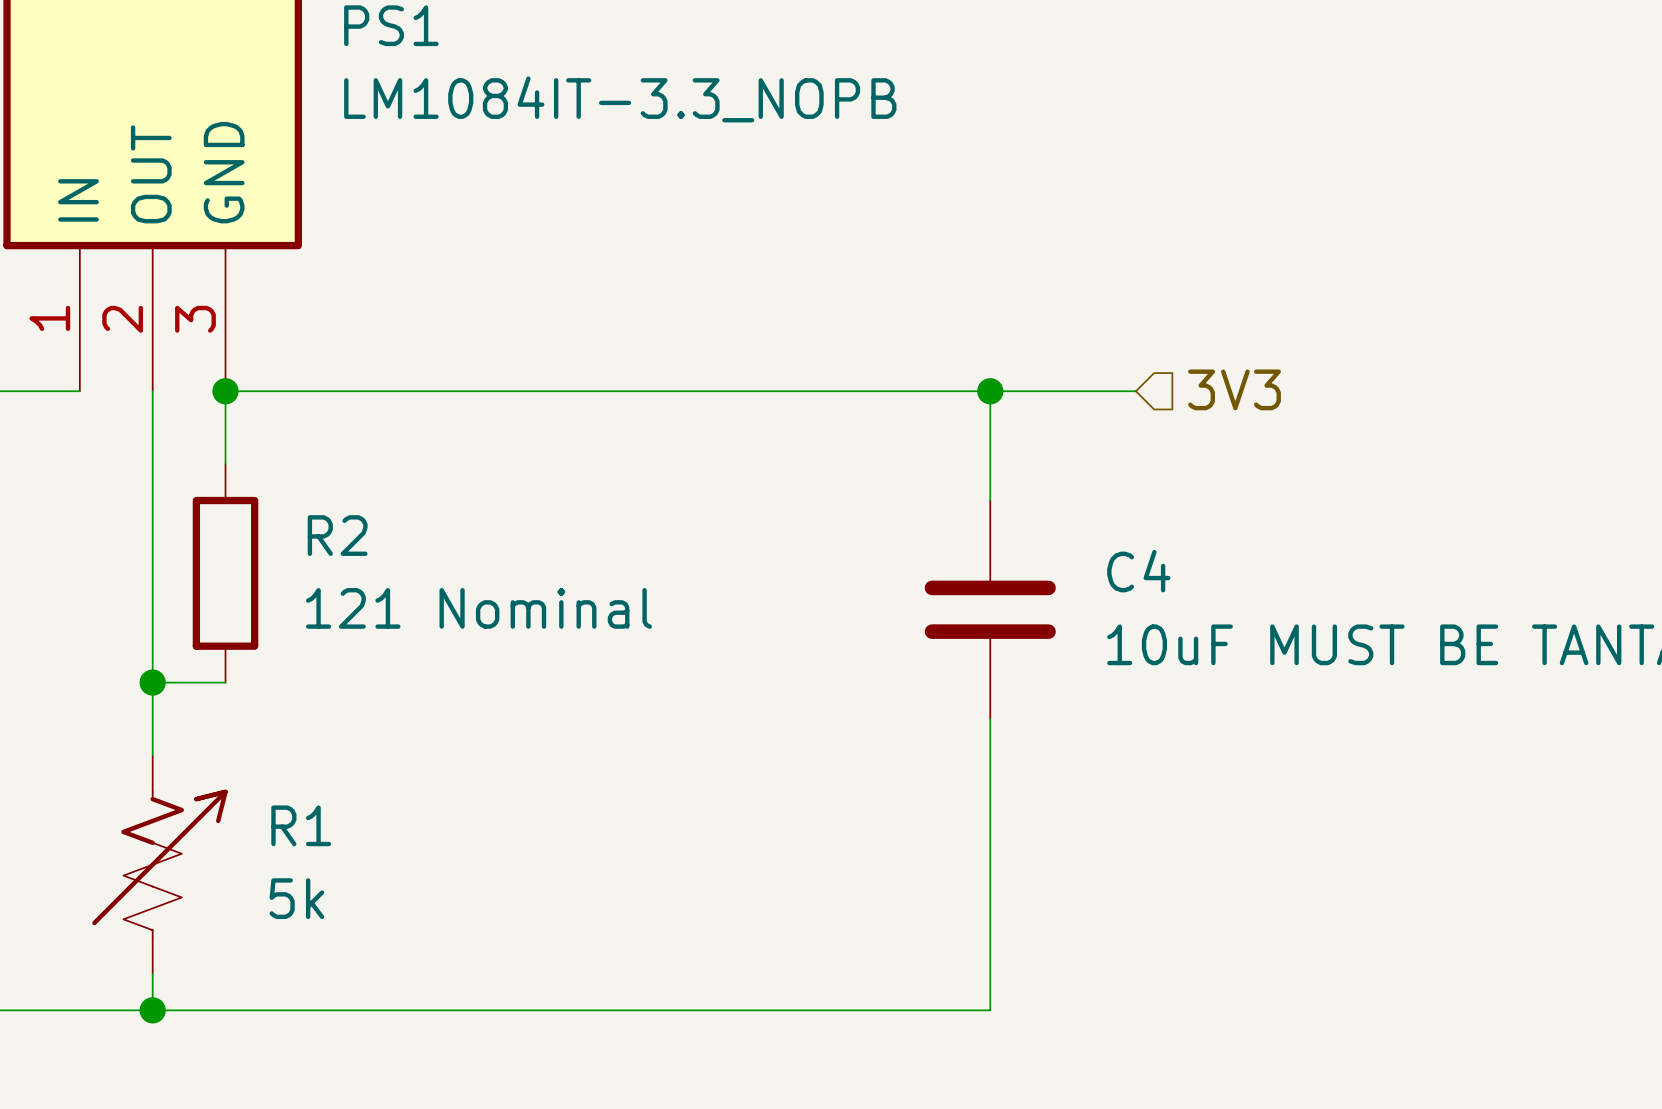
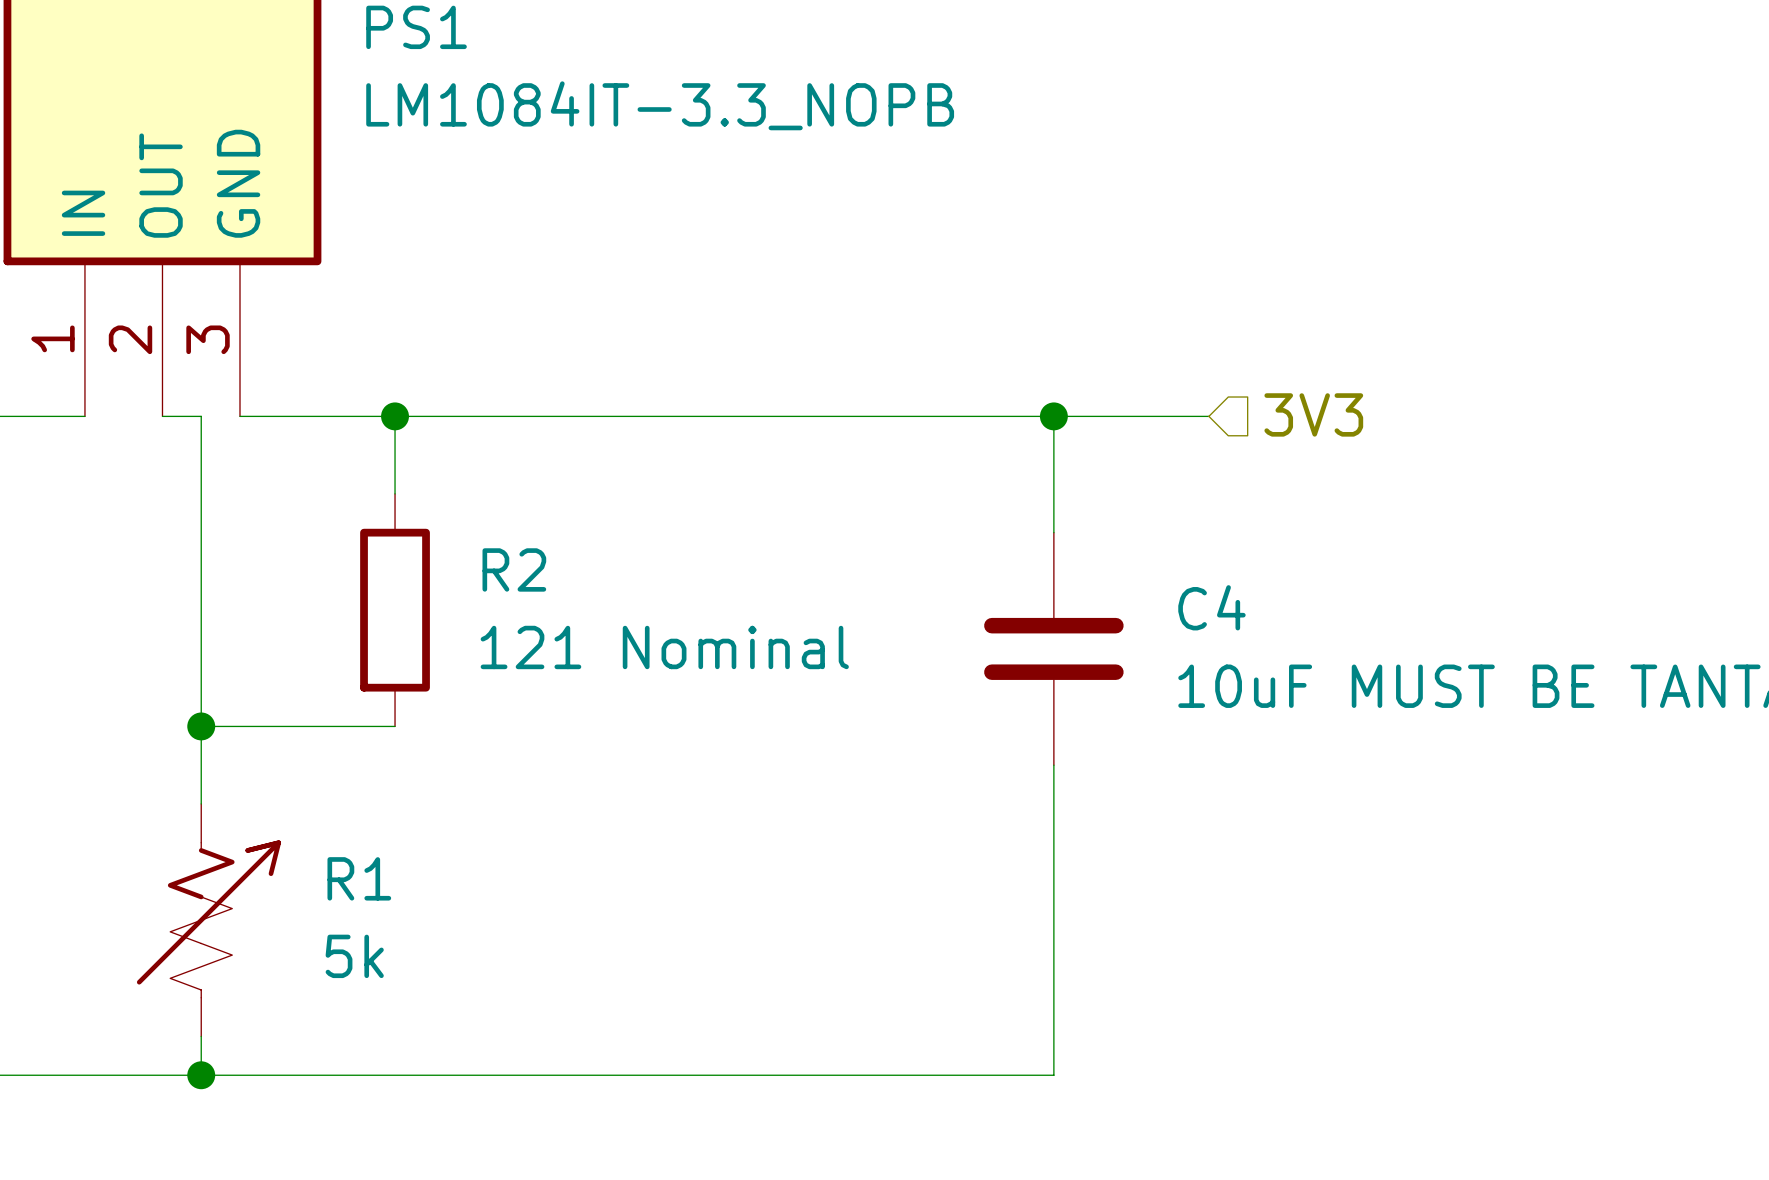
wire: (152, 391) (152, 755) -> (162, 416) (201, 416) (201, 803)
wire: (225, 391) (225, 464) -> (395, 416) (395, 493)
junction position: (225, 391) -> (395, 416)
R2 position: (225, 573) -> (395, 610)
wire: (152, 682) (189, 682) -> none
junction position: (152, 682) -> (201, 726)
wire: none -> (239, 726) (395, 726)
R1 position: (159, 864) -> (208, 920)
wire: (152, 973) (152, 1010) -> (201, 1036) (201, 1075)
junction position: (152, 1010) -> (201, 1075)

